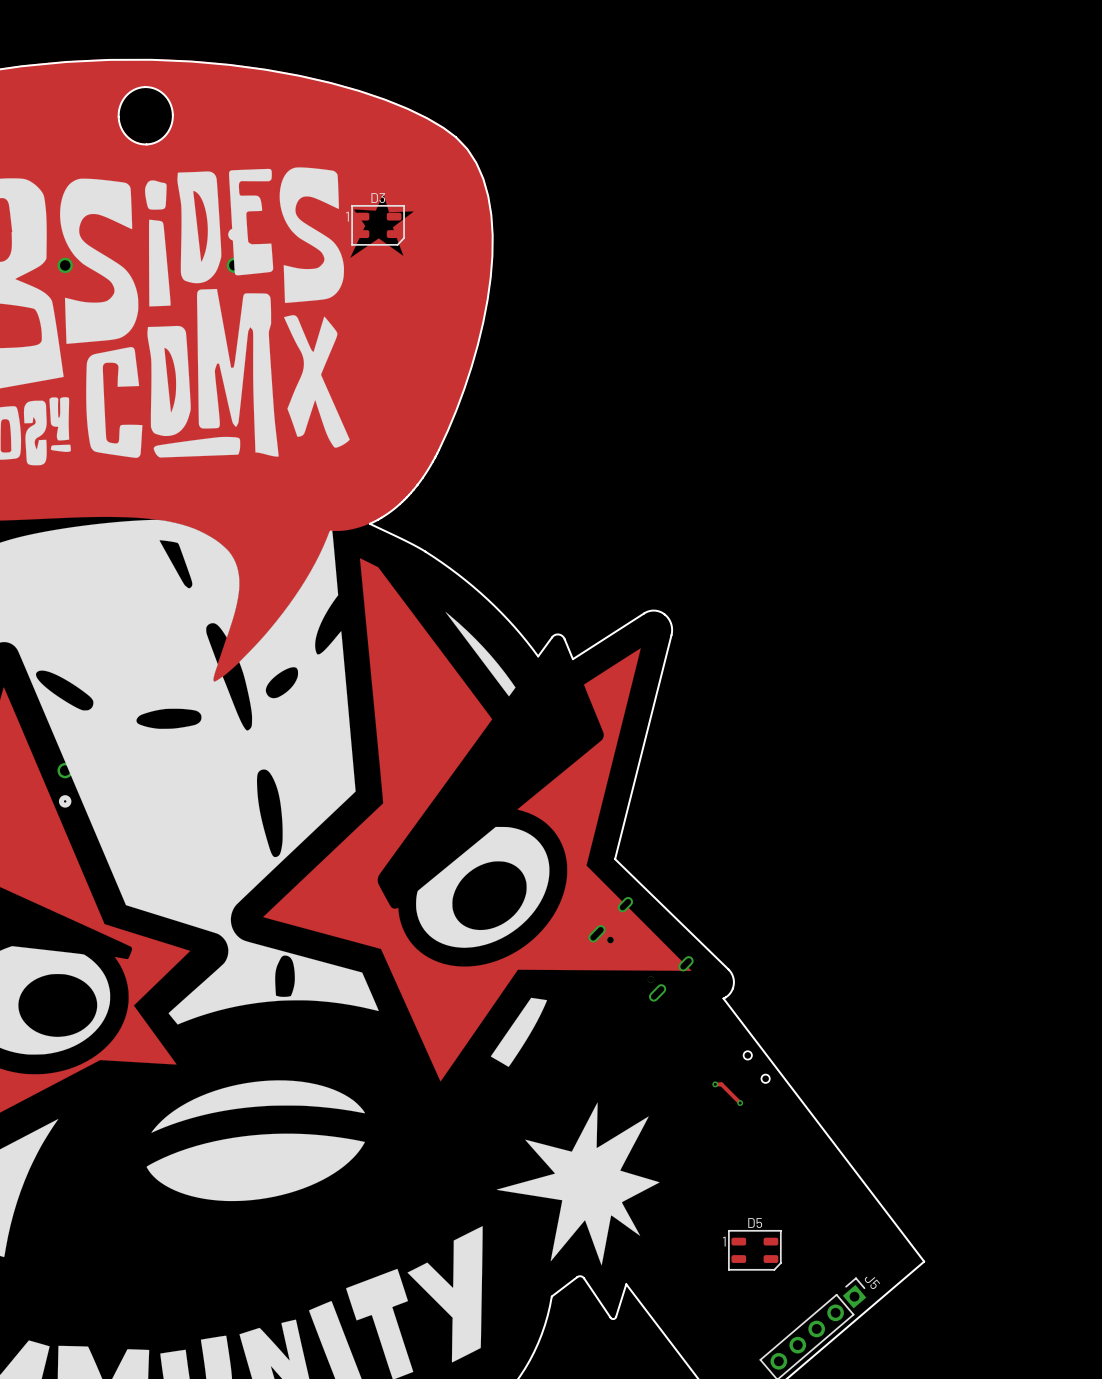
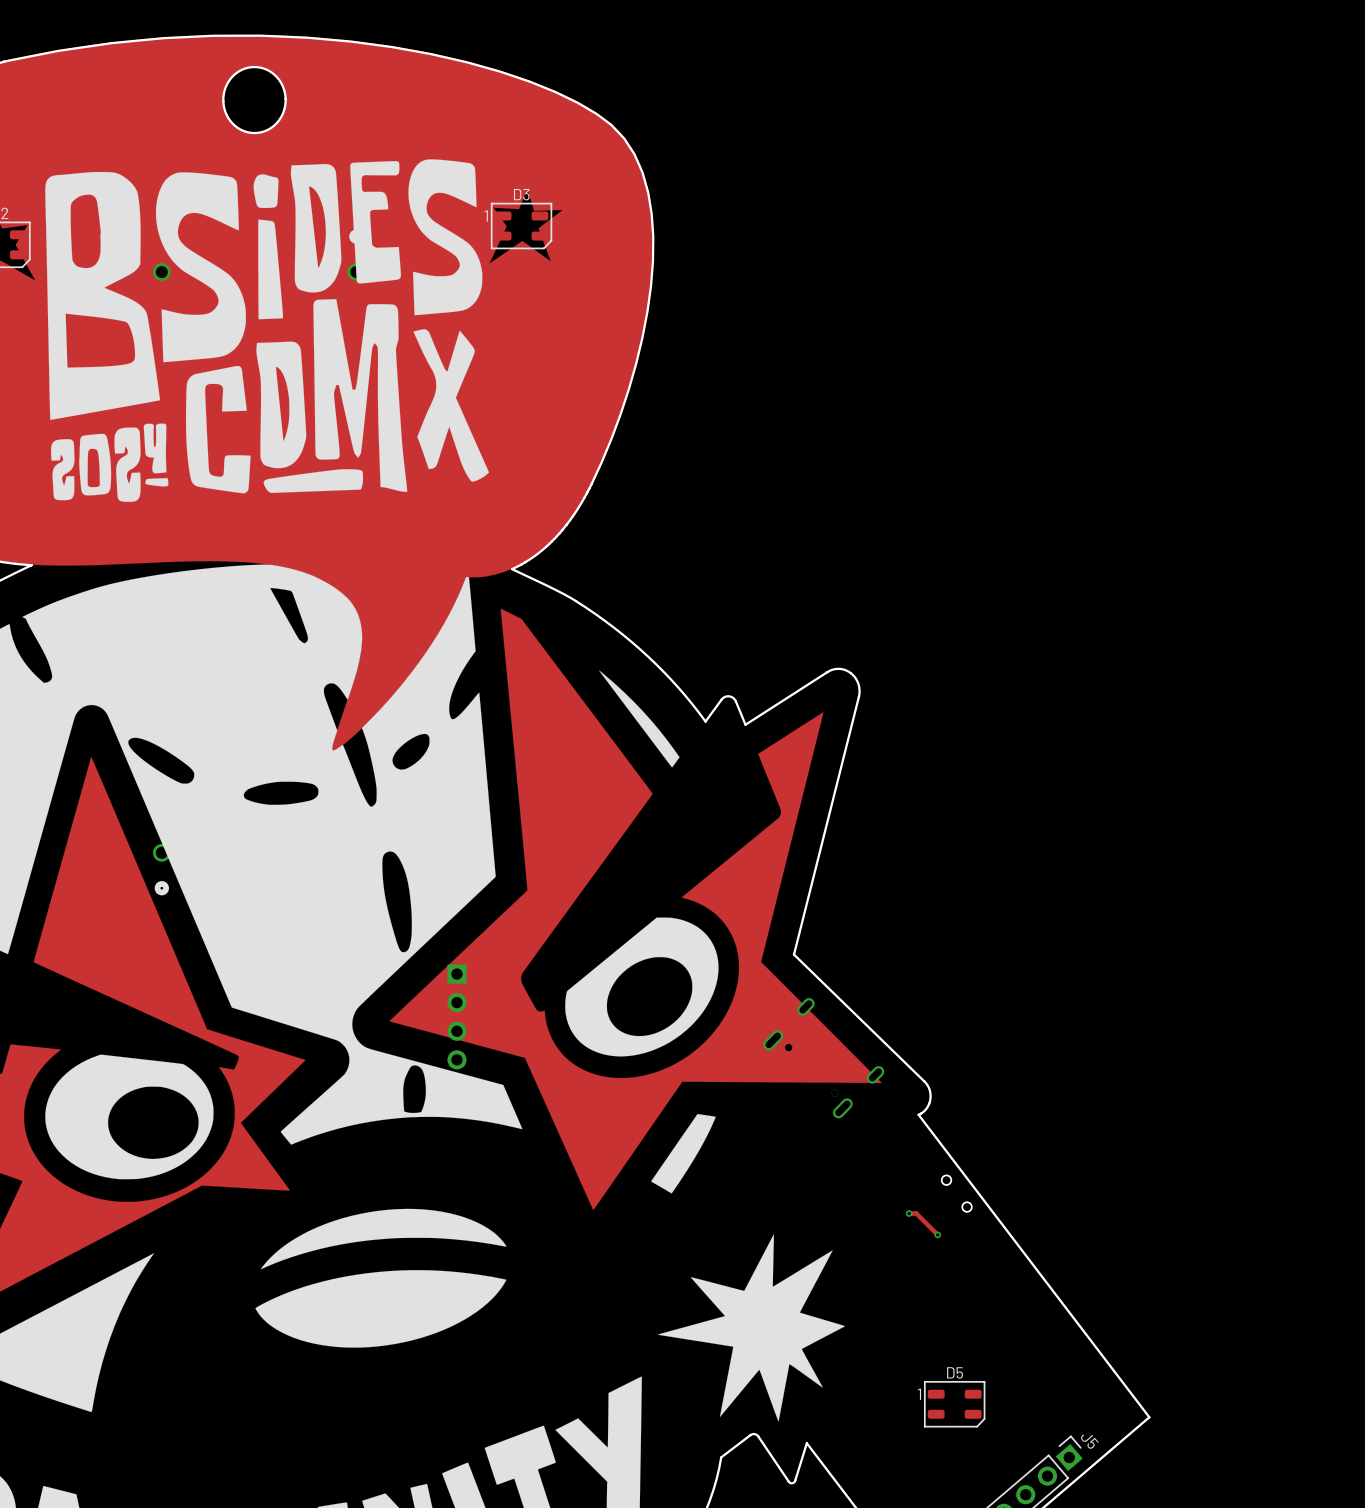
part: none -> (456, 1016)

